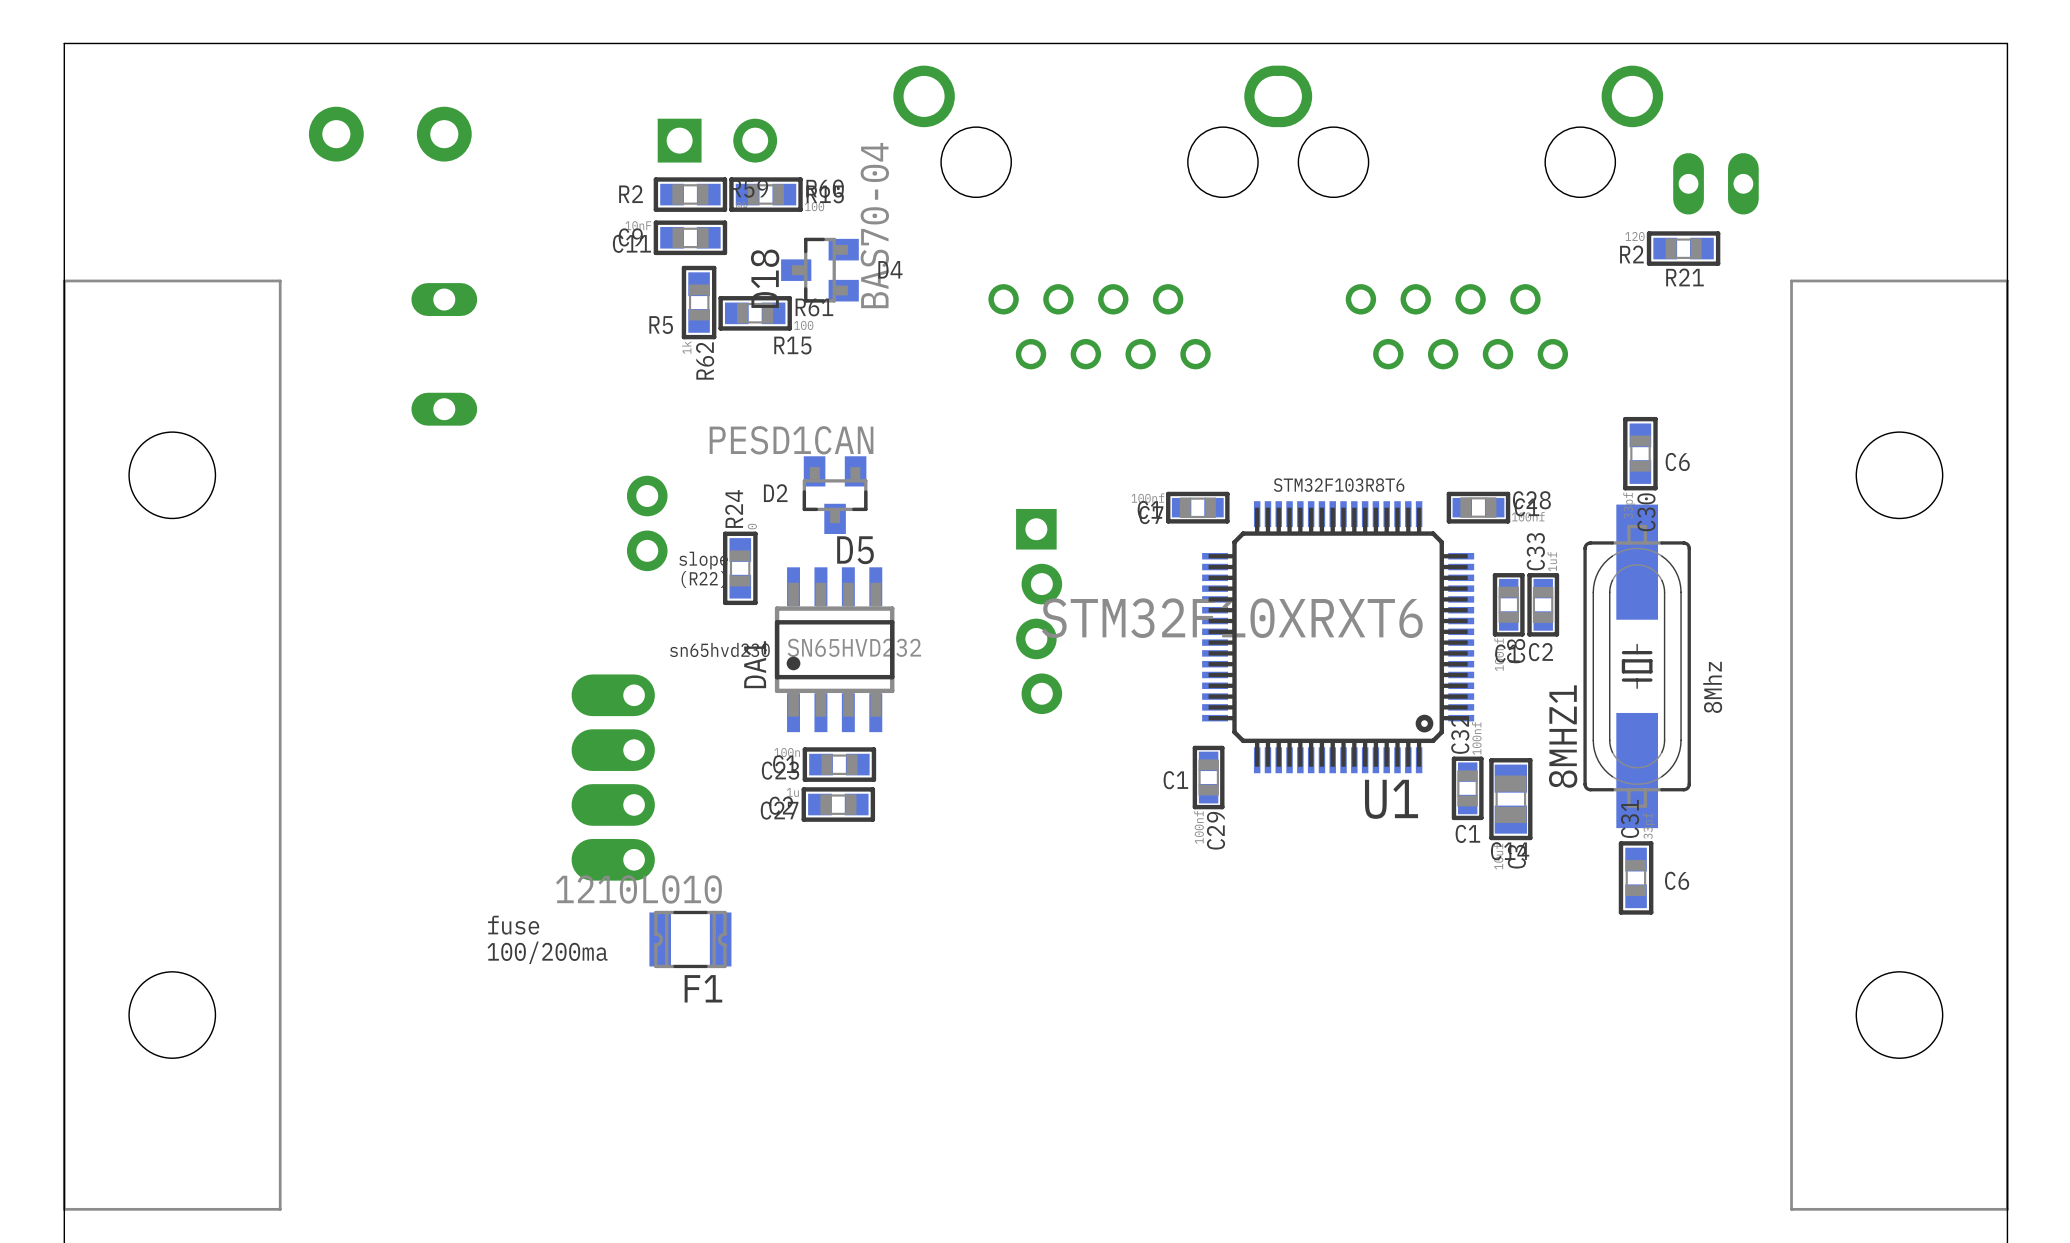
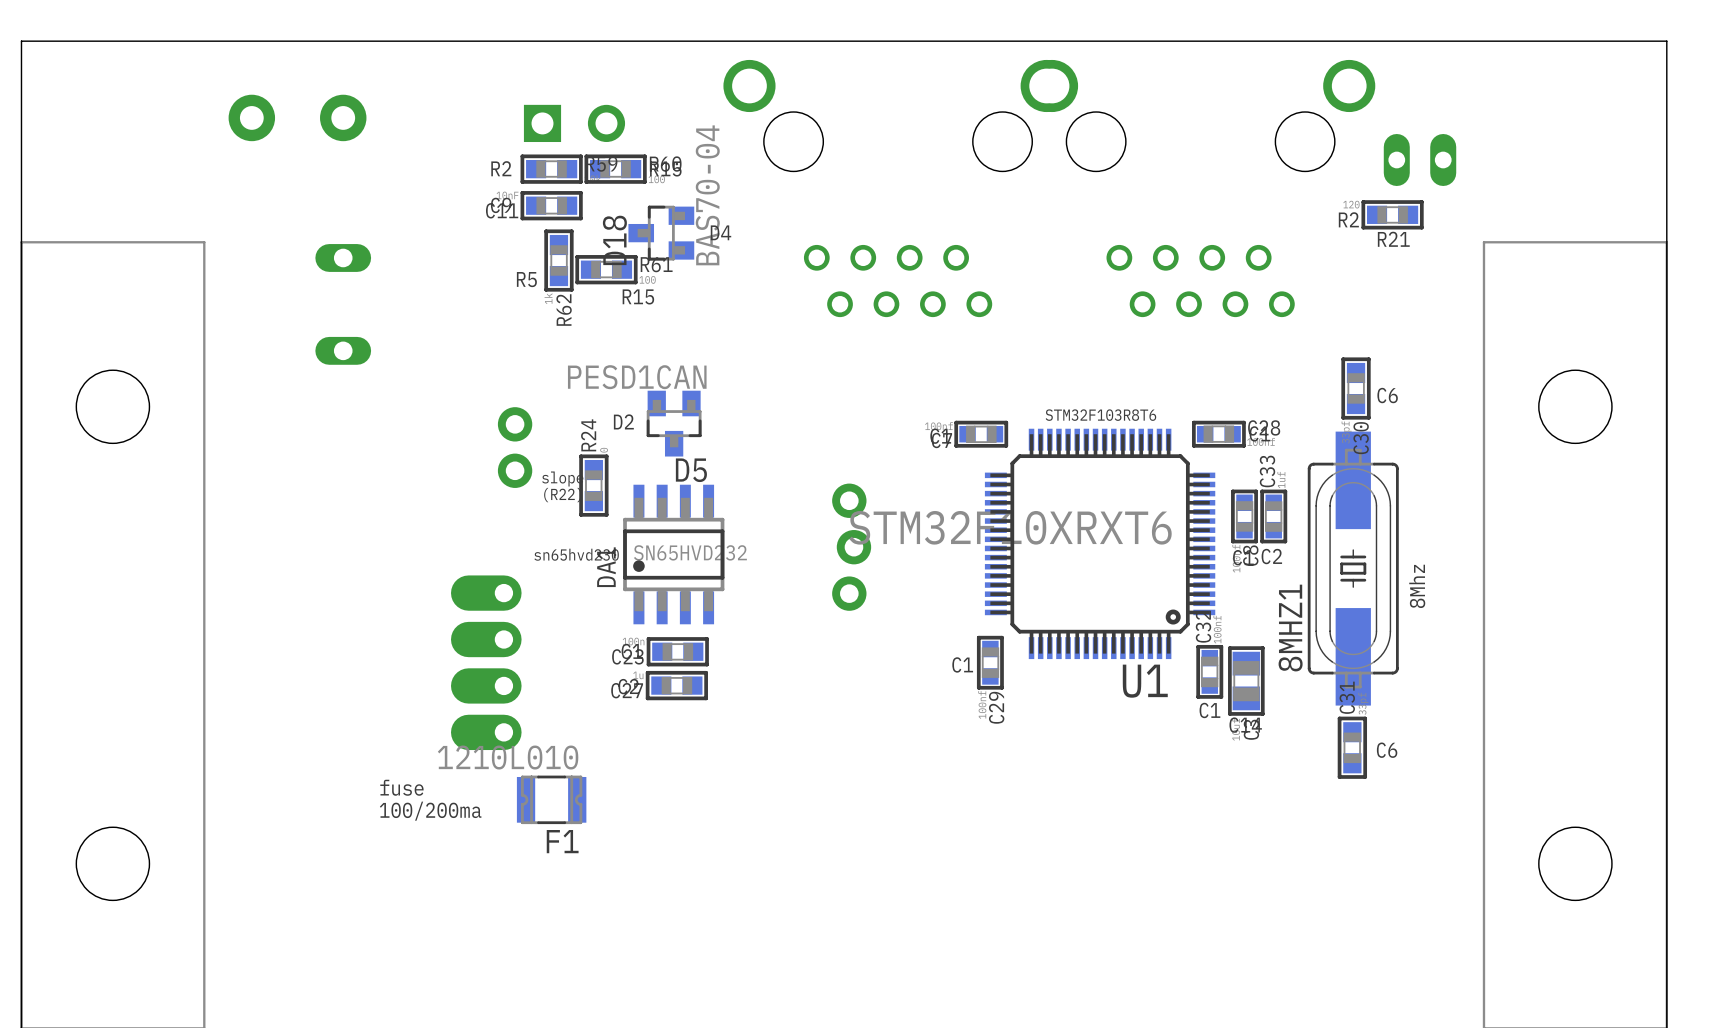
part: (1039, 611) -> none
part: none -> (851, 547)

